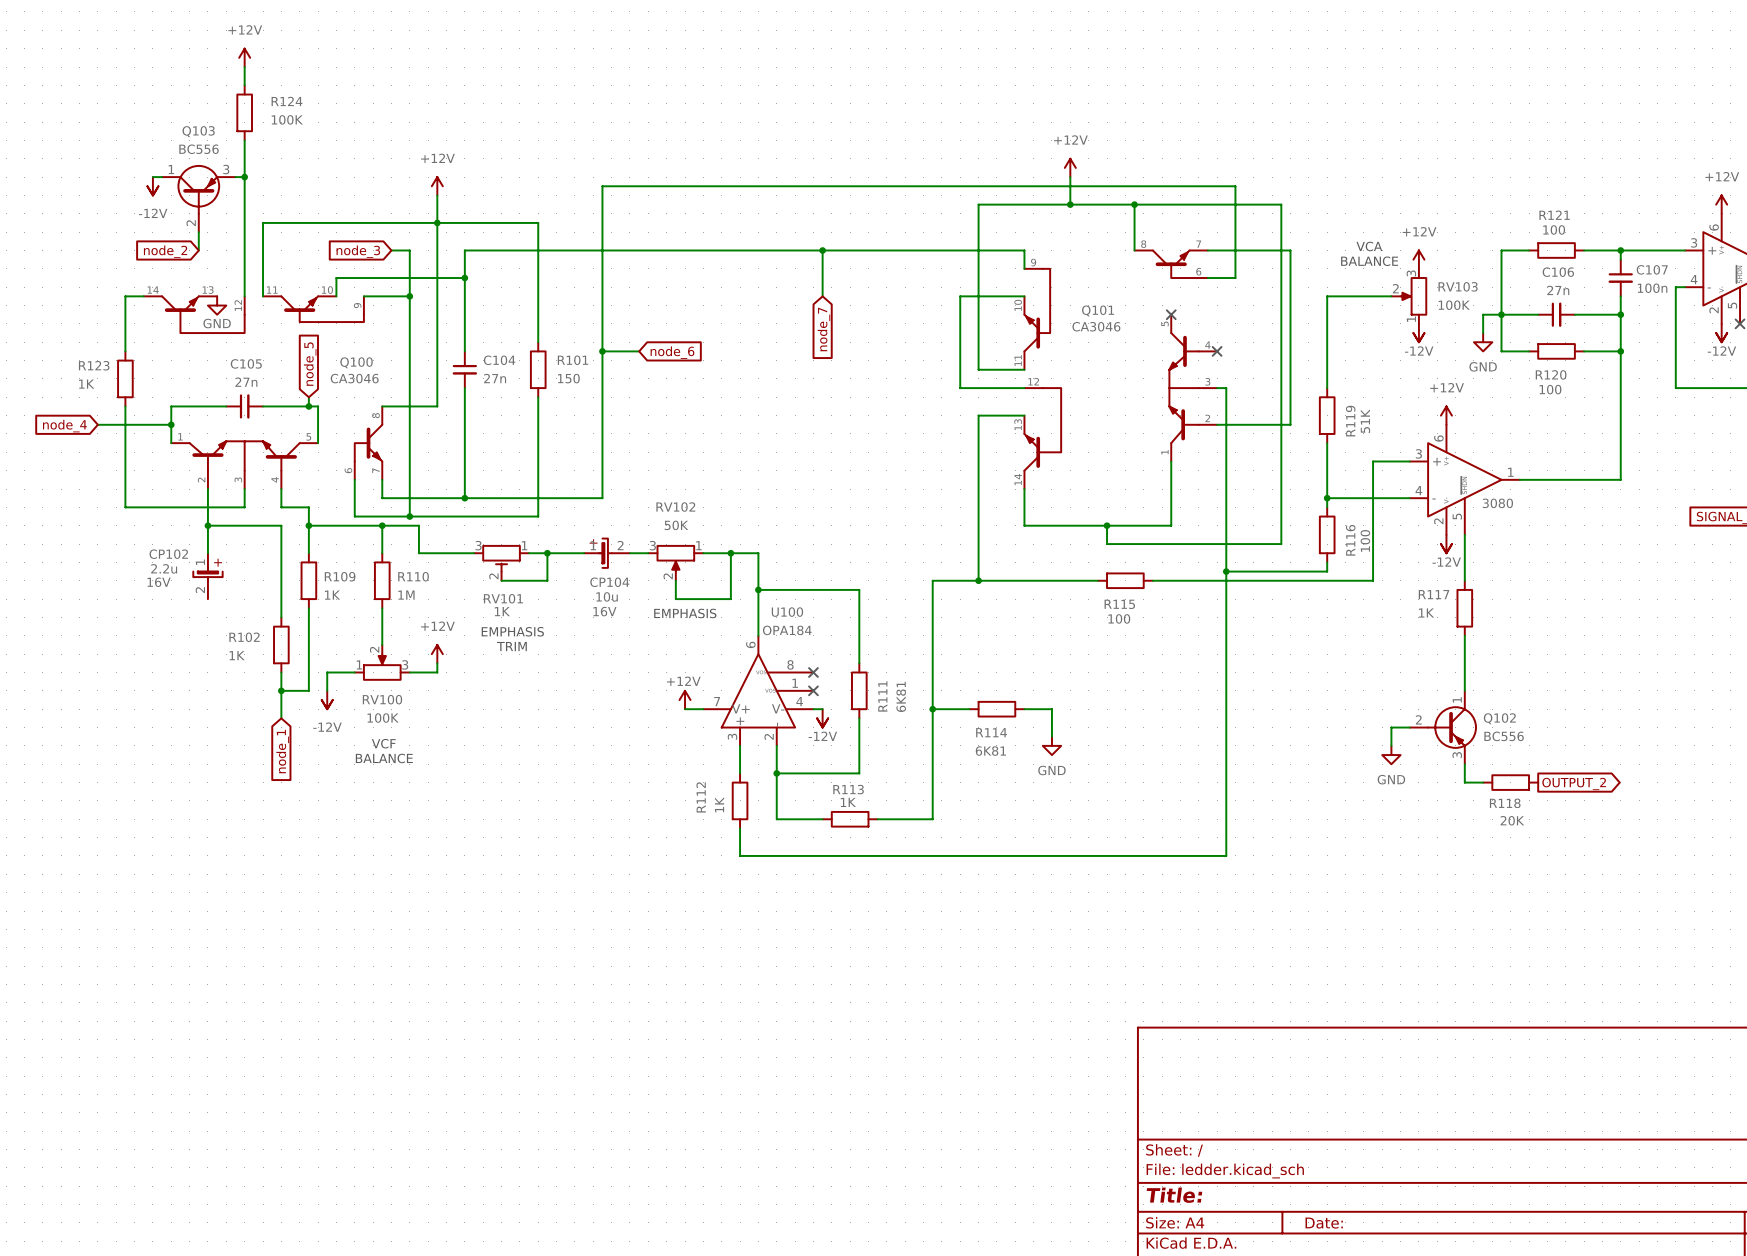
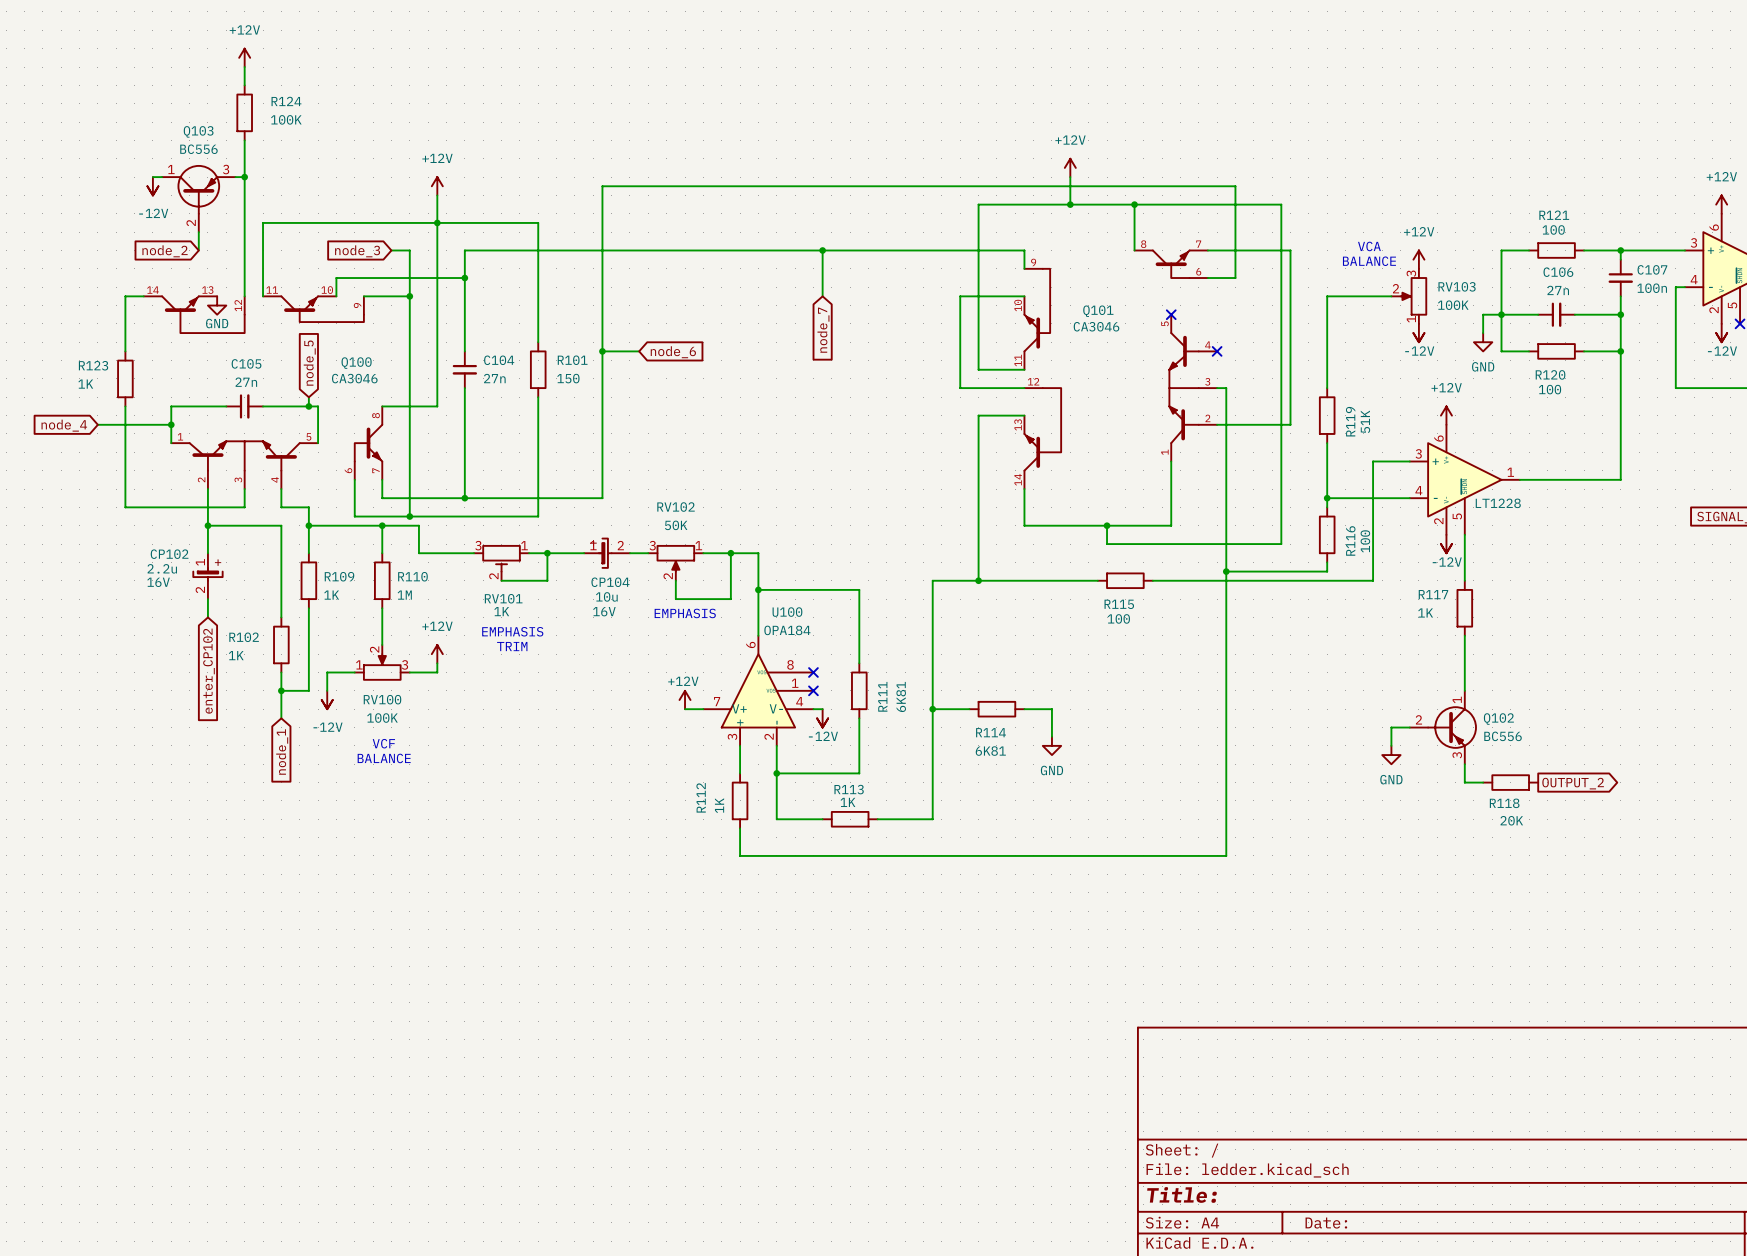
part value: 3080 (1497, 503) -> LT1228 (1498, 503)
wire: none -> (207, 599) (207, 617)
global label: none -> enter_CP102 (209, 671)

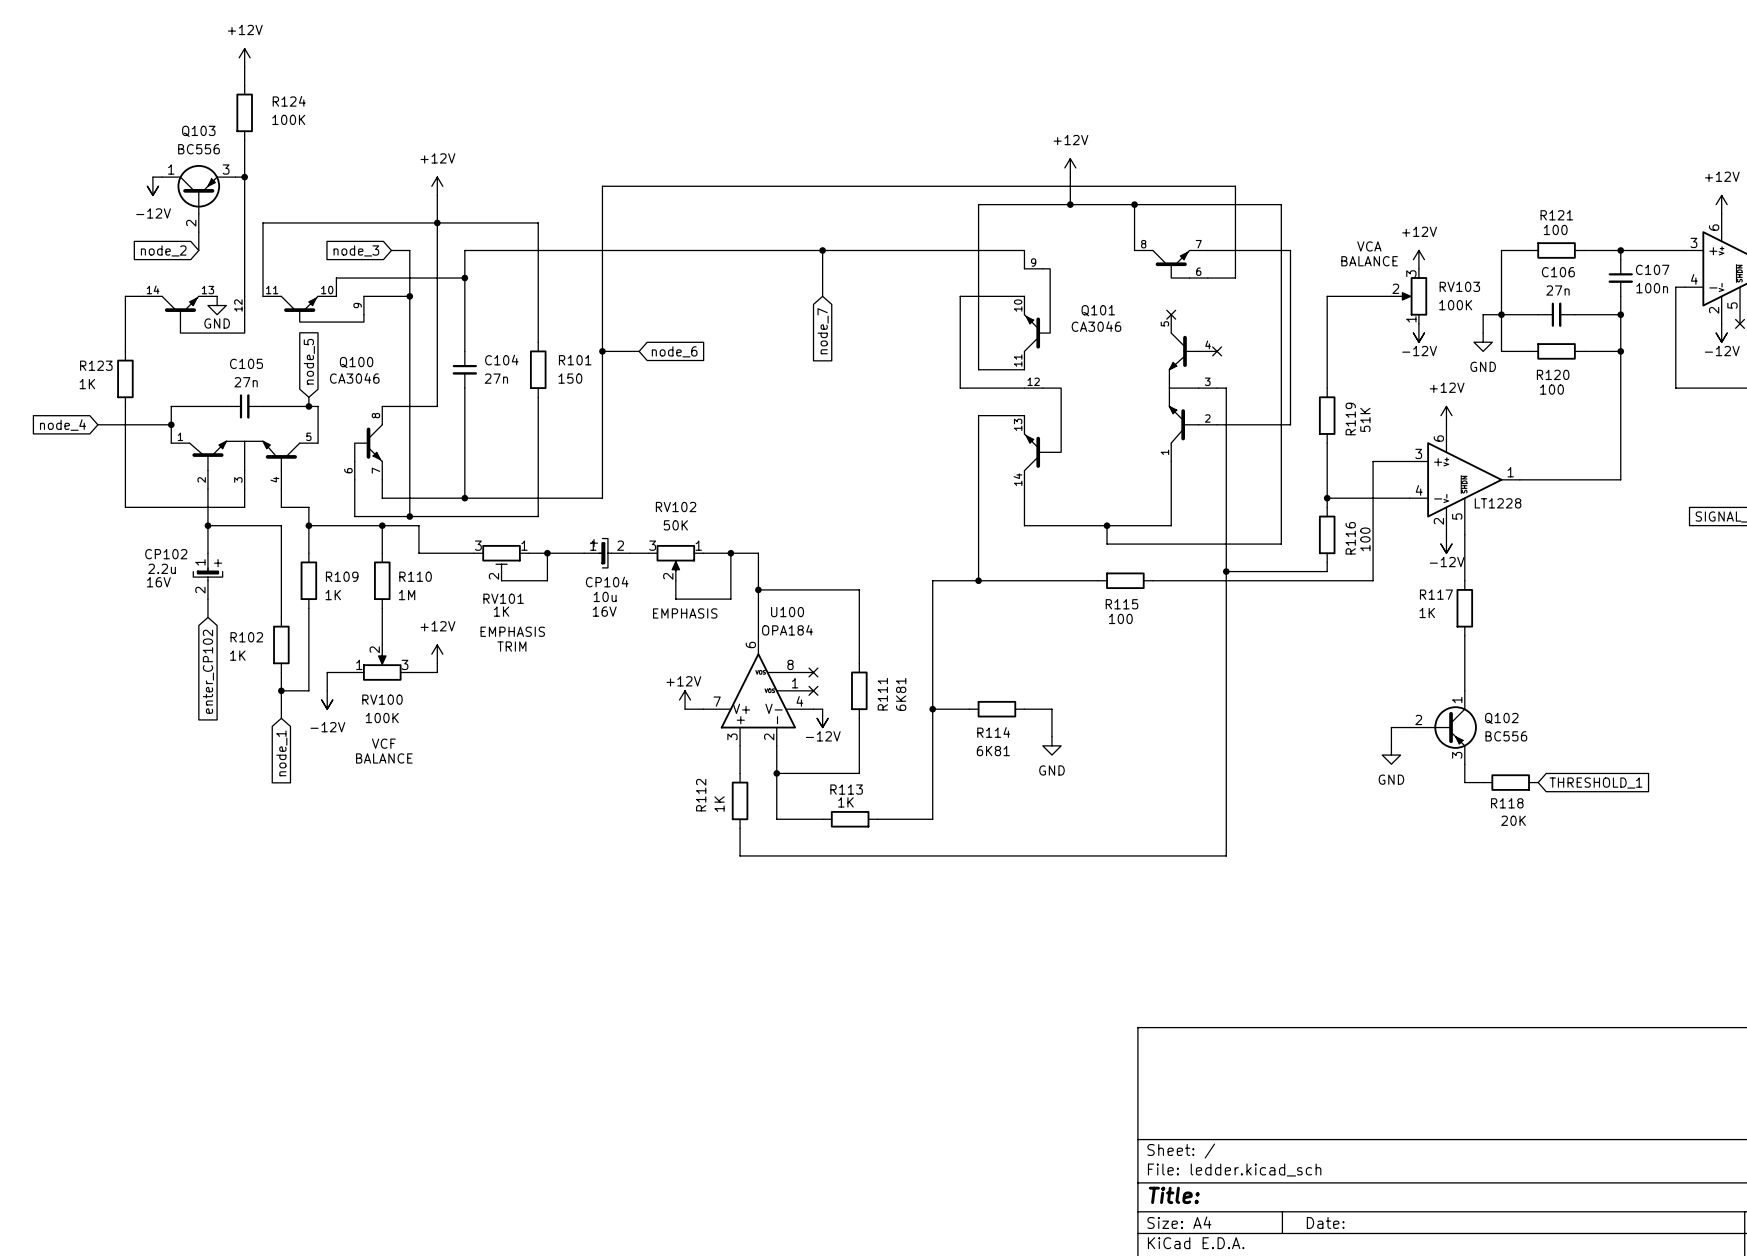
global label shape: output (1573, 783) -> input (1595, 783)
global label: OUTPUT_2 (1573, 783) -> THRESHOLD_1 (1595, 783)

